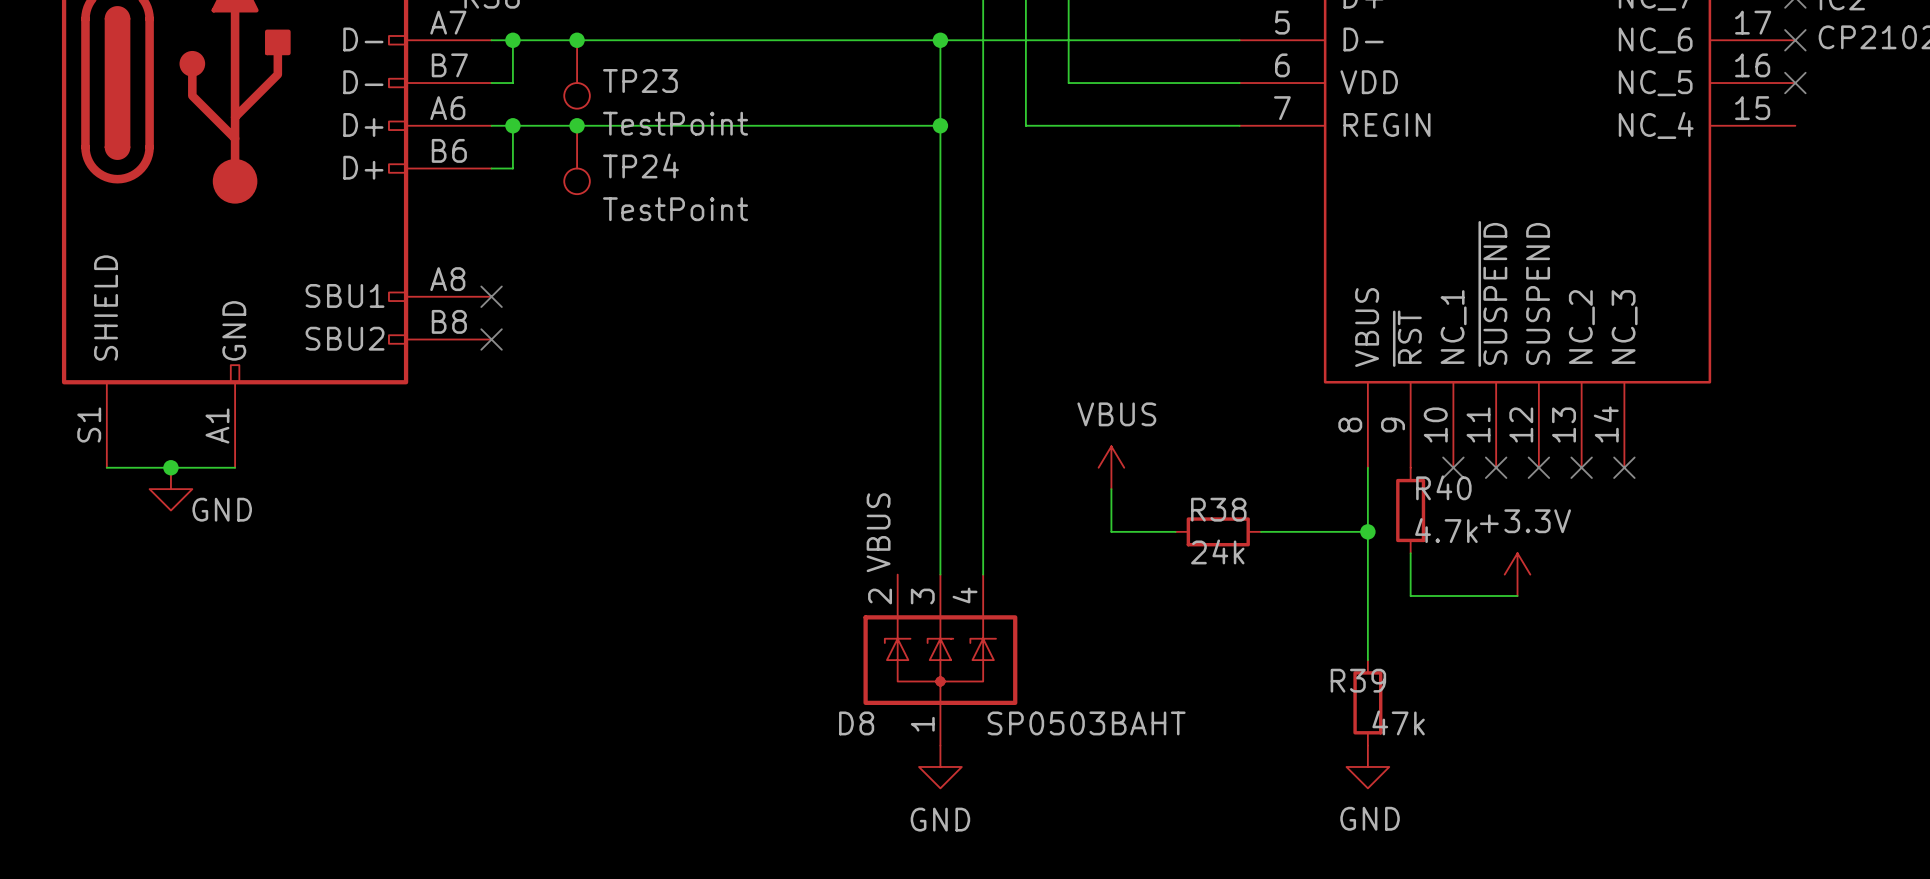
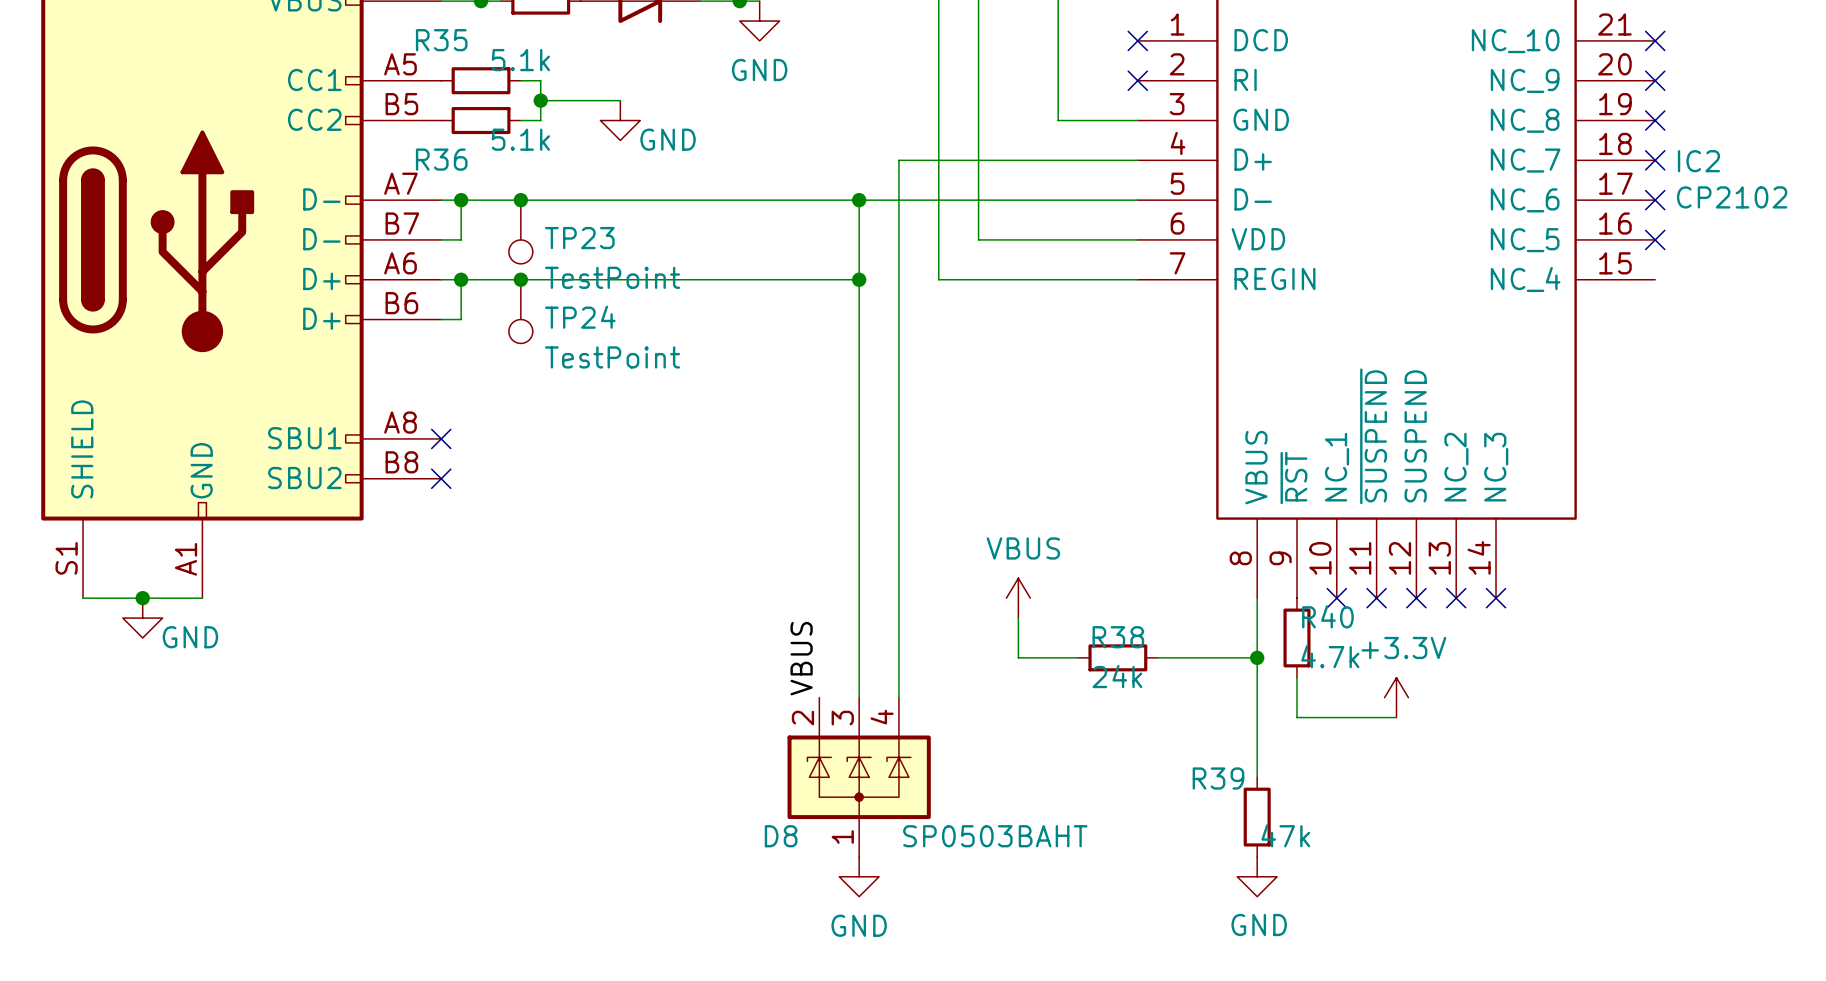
R39 name position: R39 (1358, 680) -> R39 (1218, 778)

